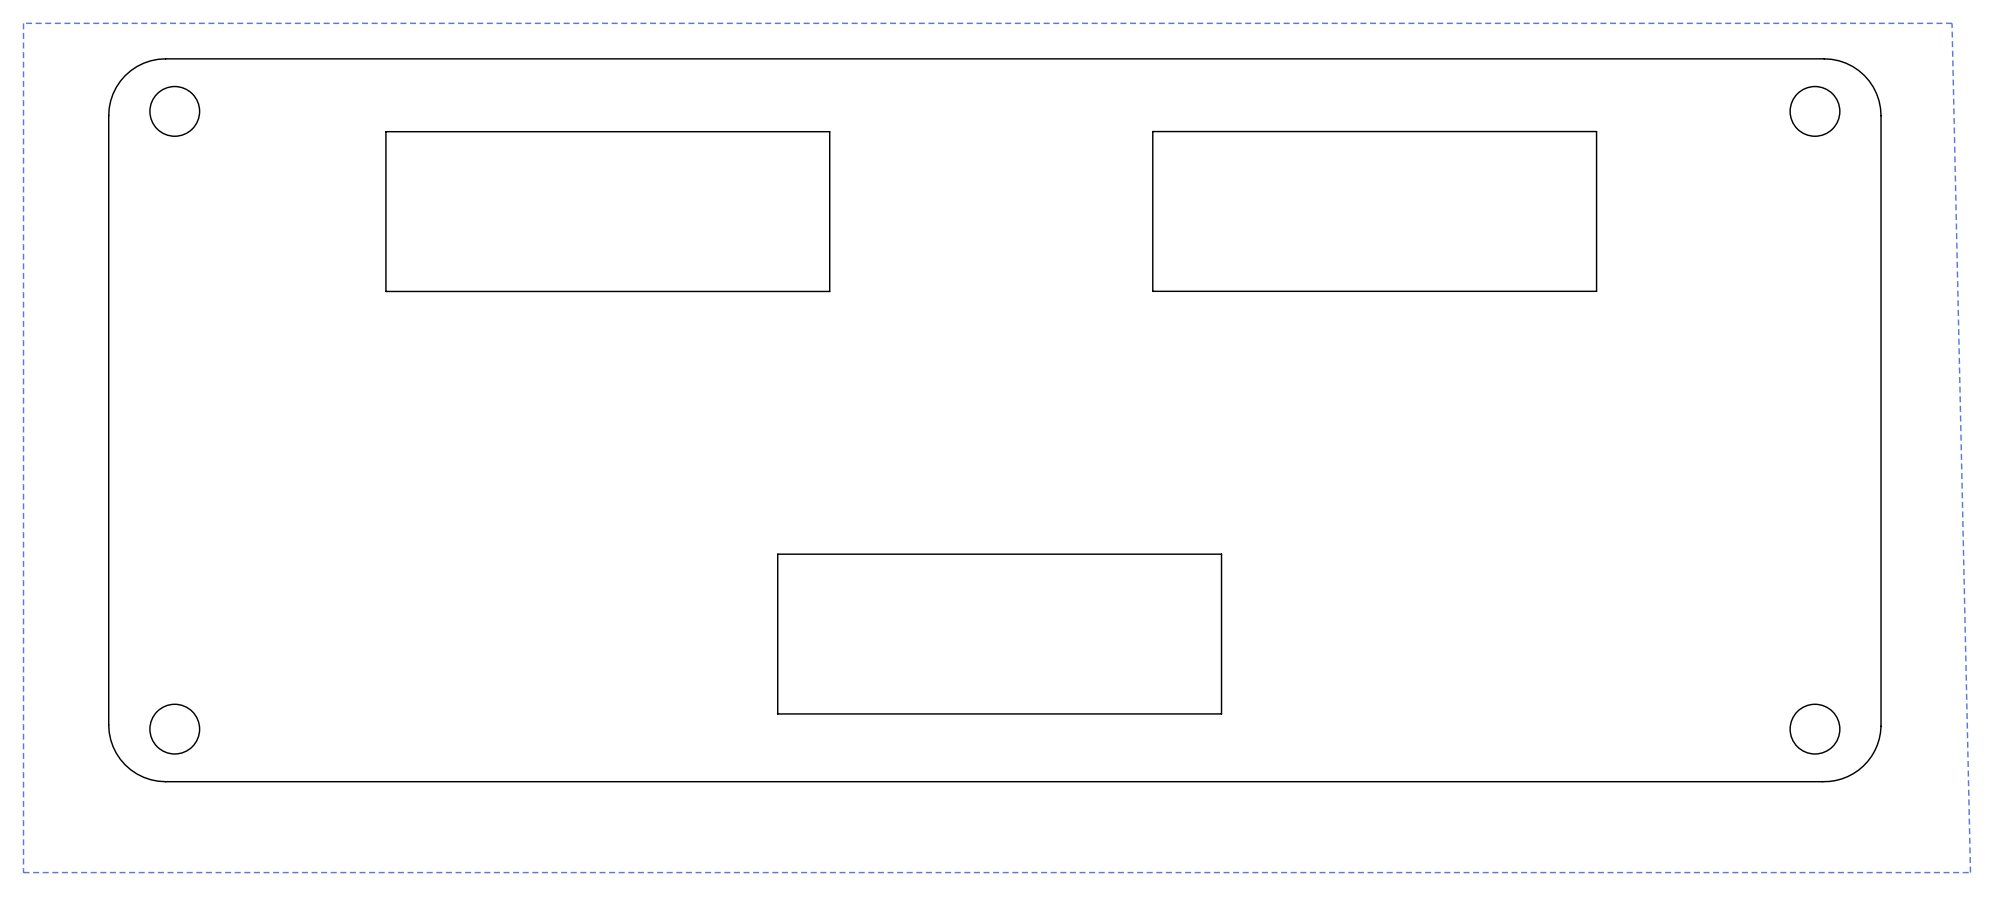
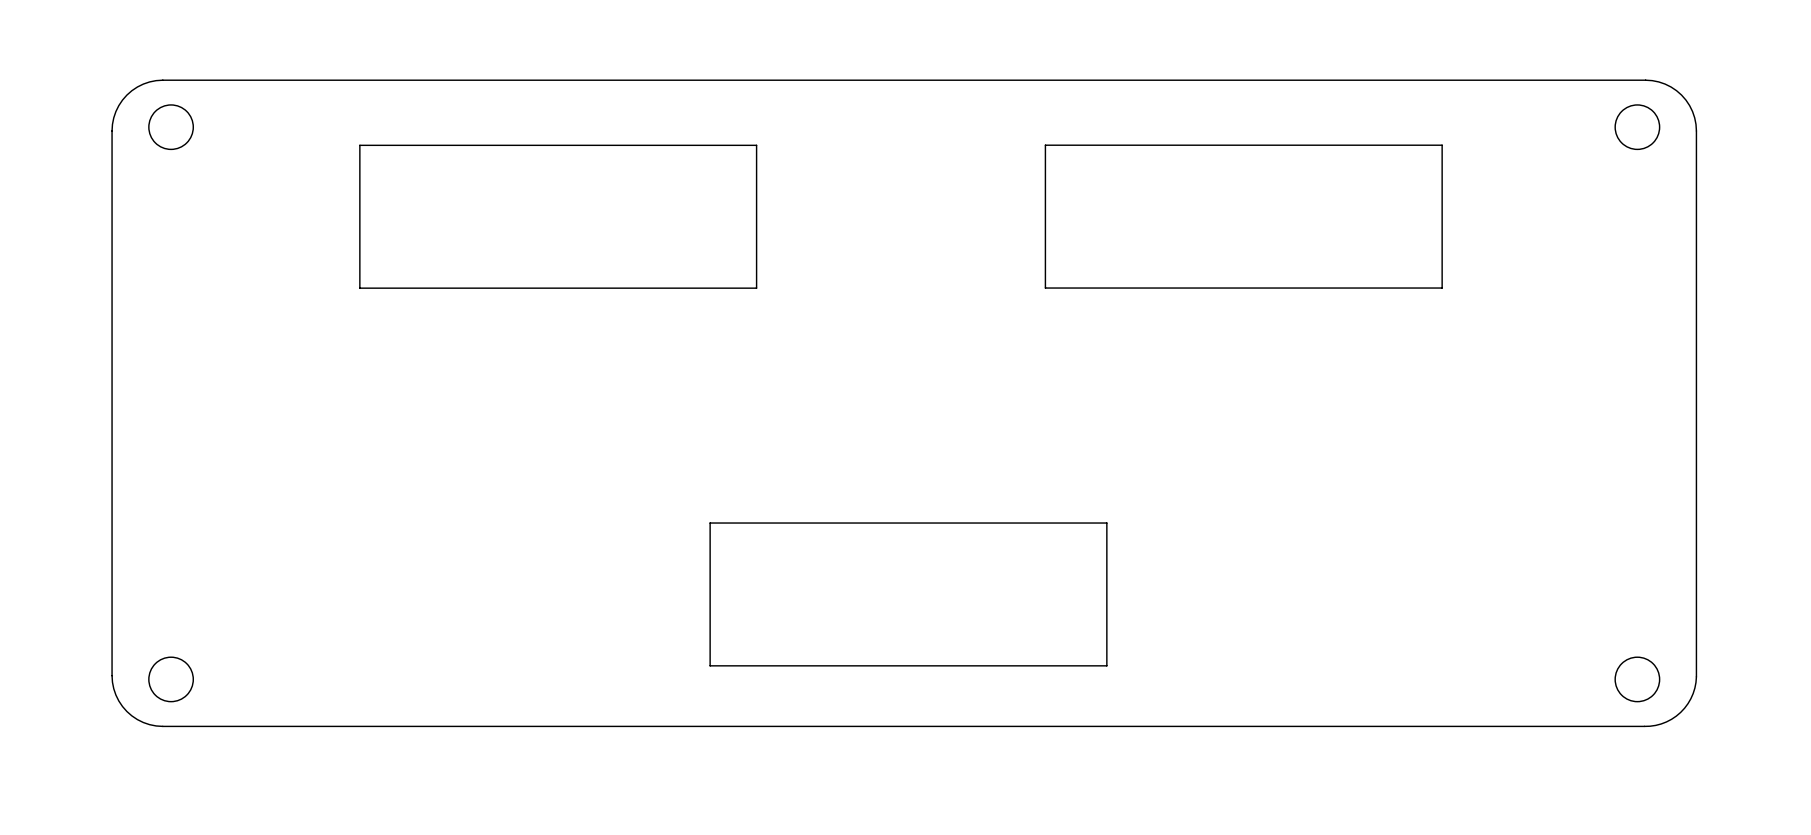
zone outline: (1952, 23) (1970, 872) (23, 872) (23, 23) (1952, 23) -> none

